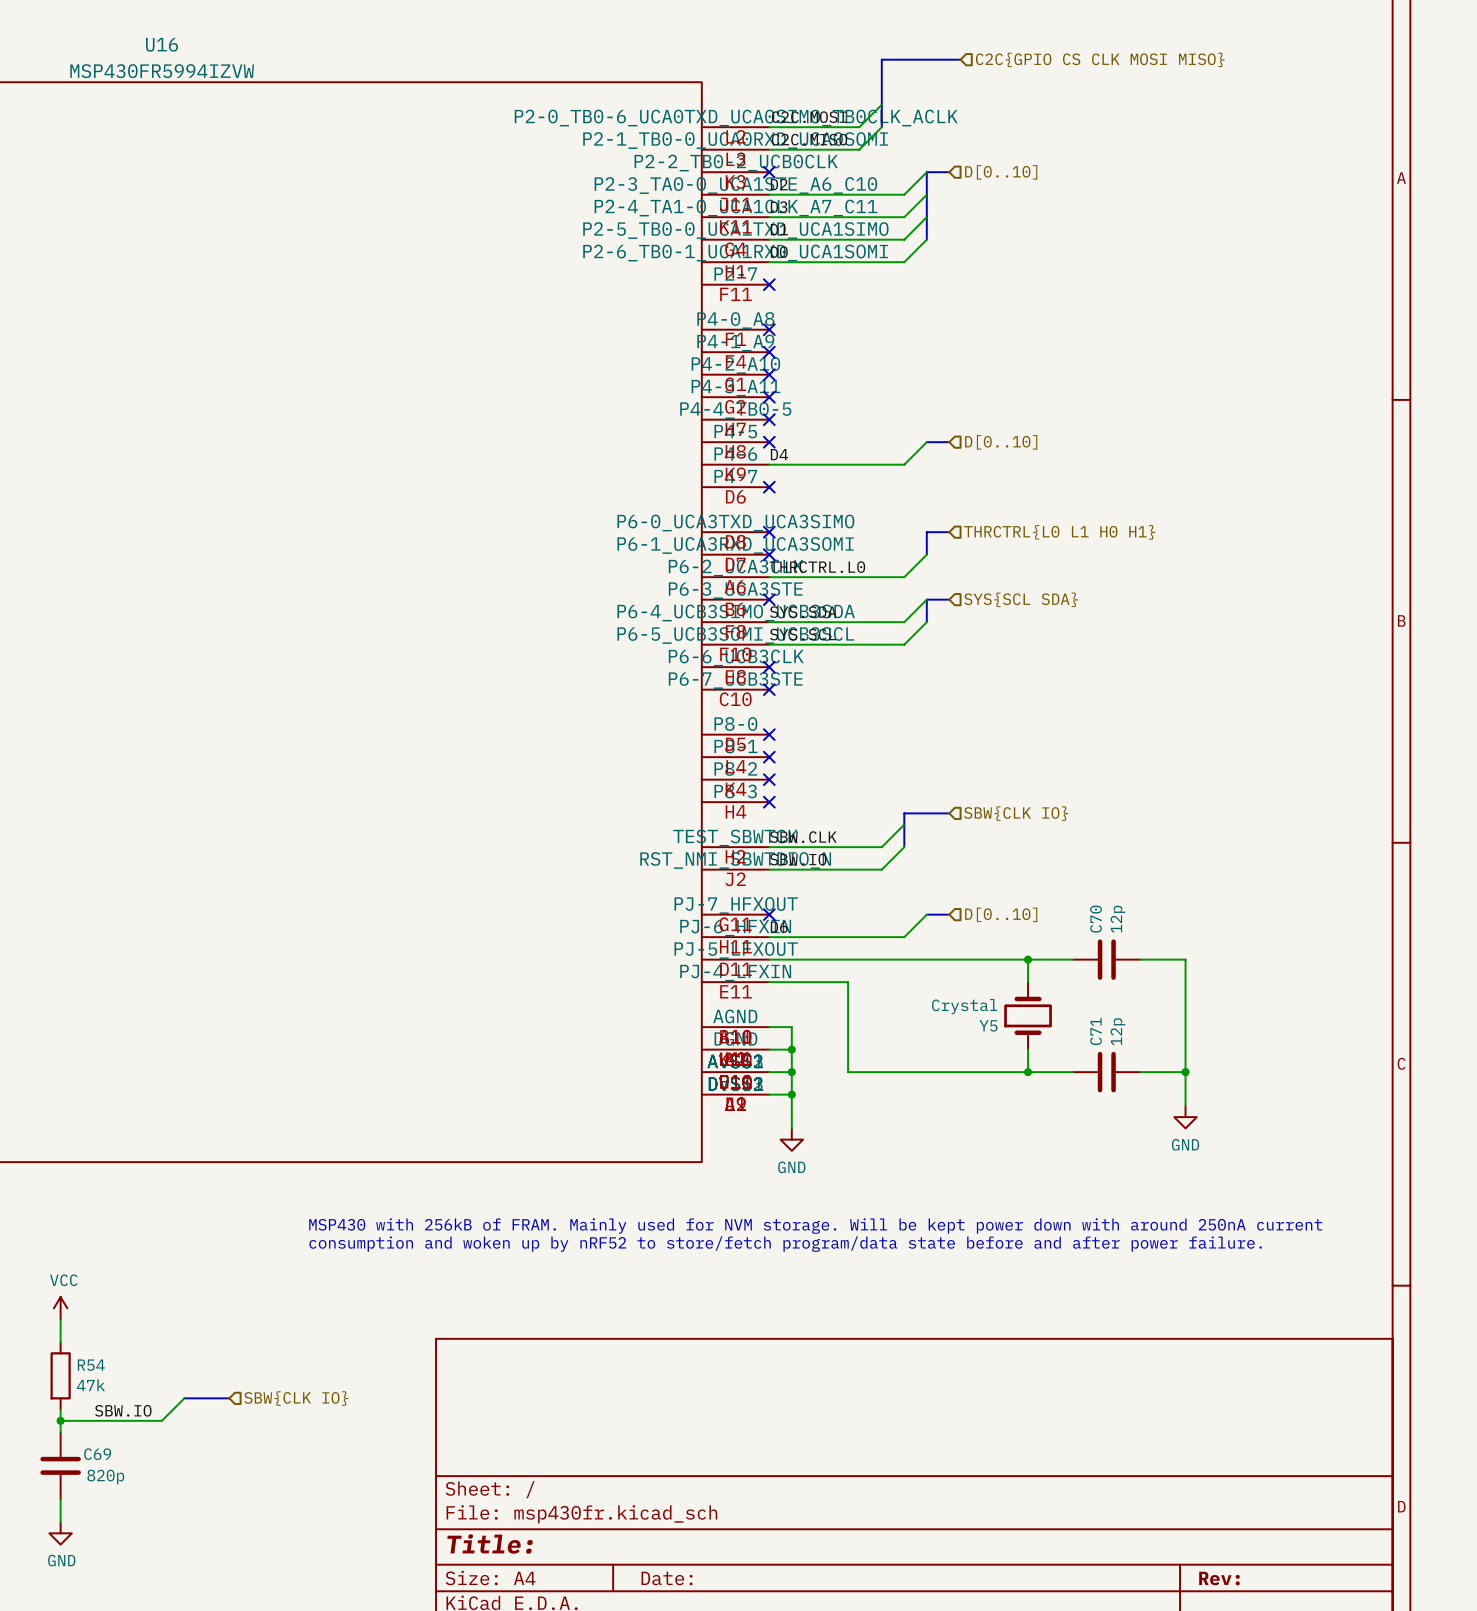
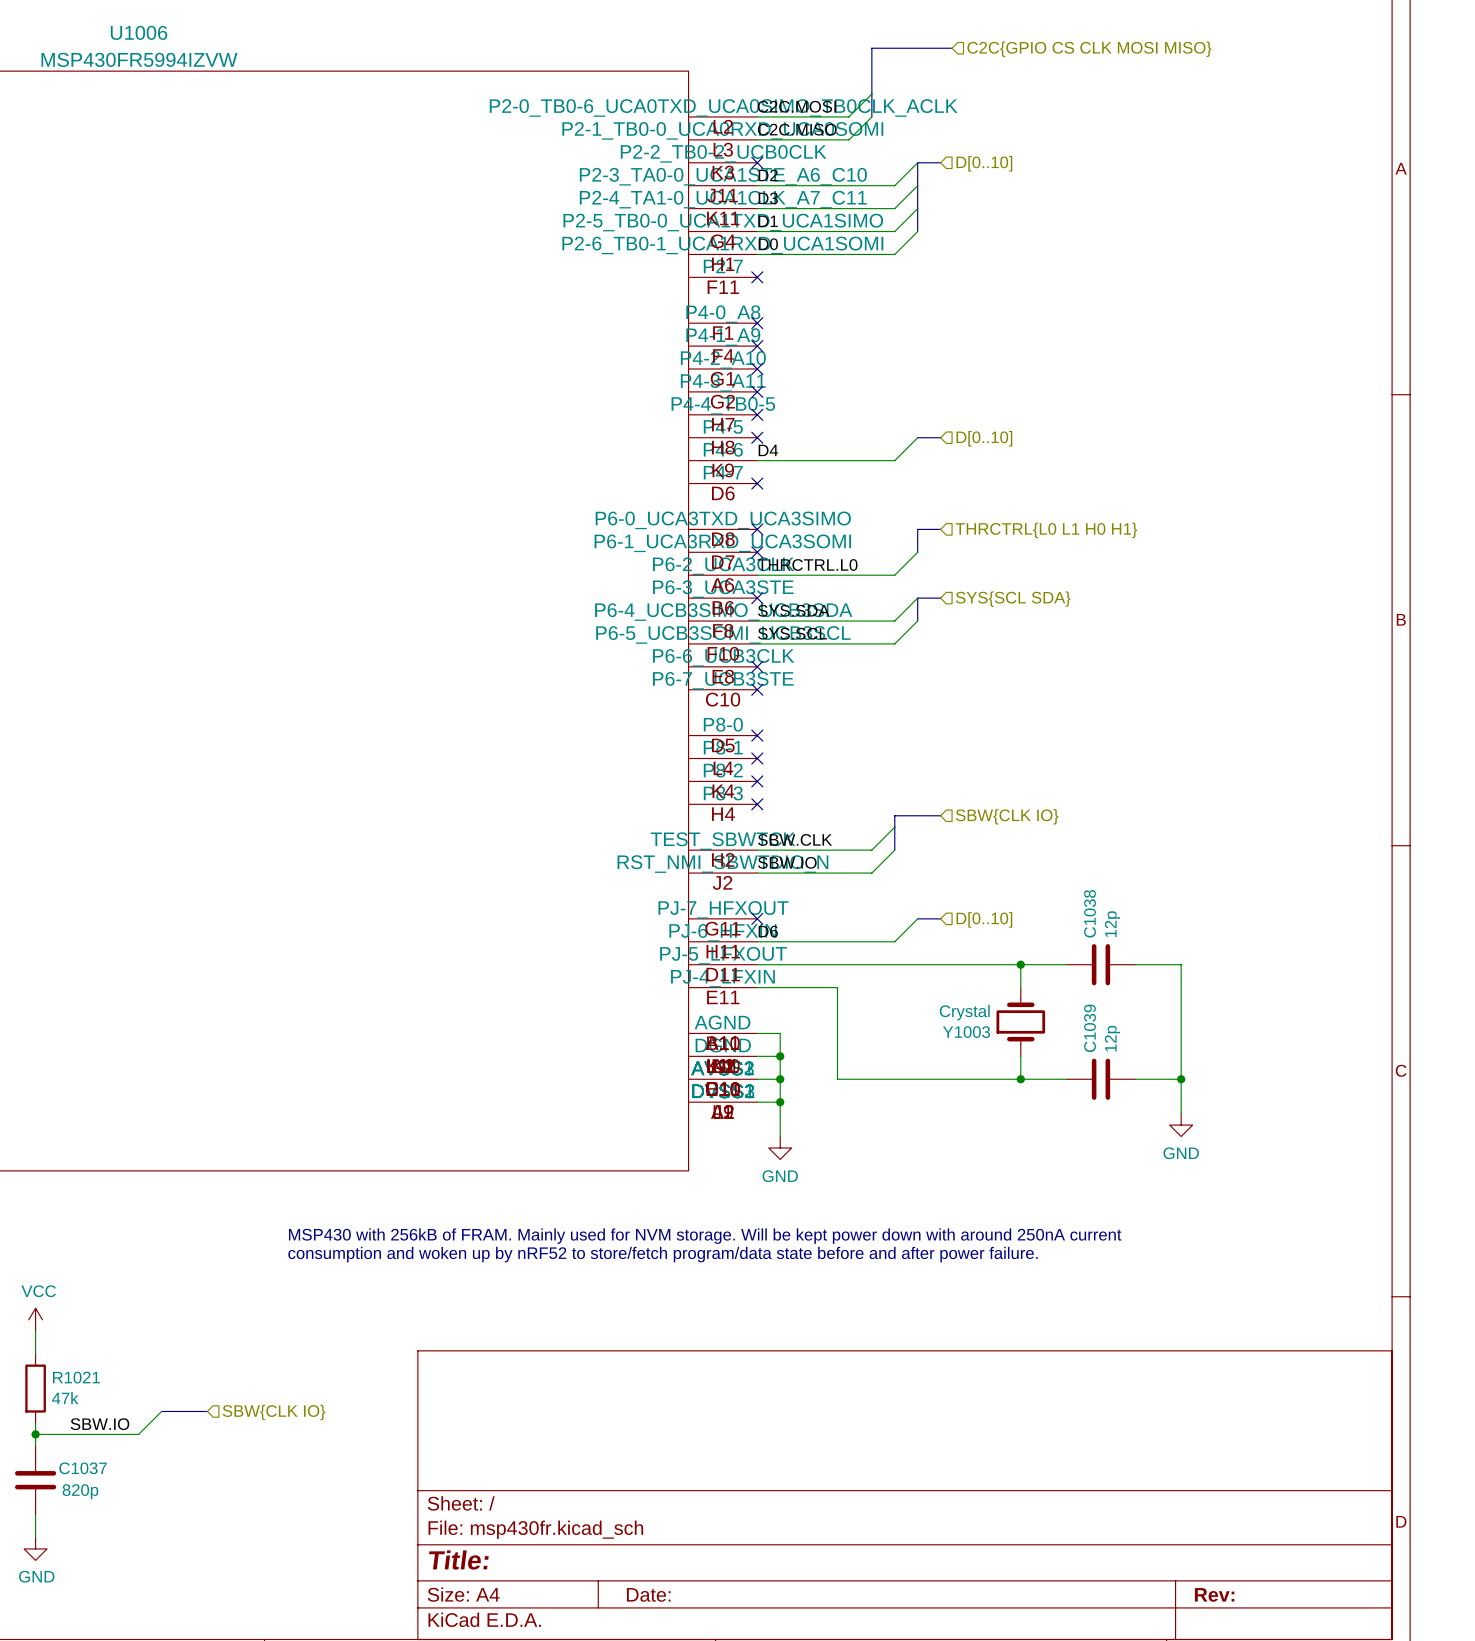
U16 name: U16 (162, 44) -> U1006 (139, 32)
C70 name: C70 (1096, 919) -> C1038 (1090, 913)
Y5 name: Y5 (988, 1025) -> Y1003 (966, 1032)
C71 name: C71 (1096, 1031) -> C1039 (1090, 1028)
R54 name: R54 (91, 1365) -> R1021 (76, 1377)
C69 name: C69 (97, 1454) -> C1037 (83, 1468)

